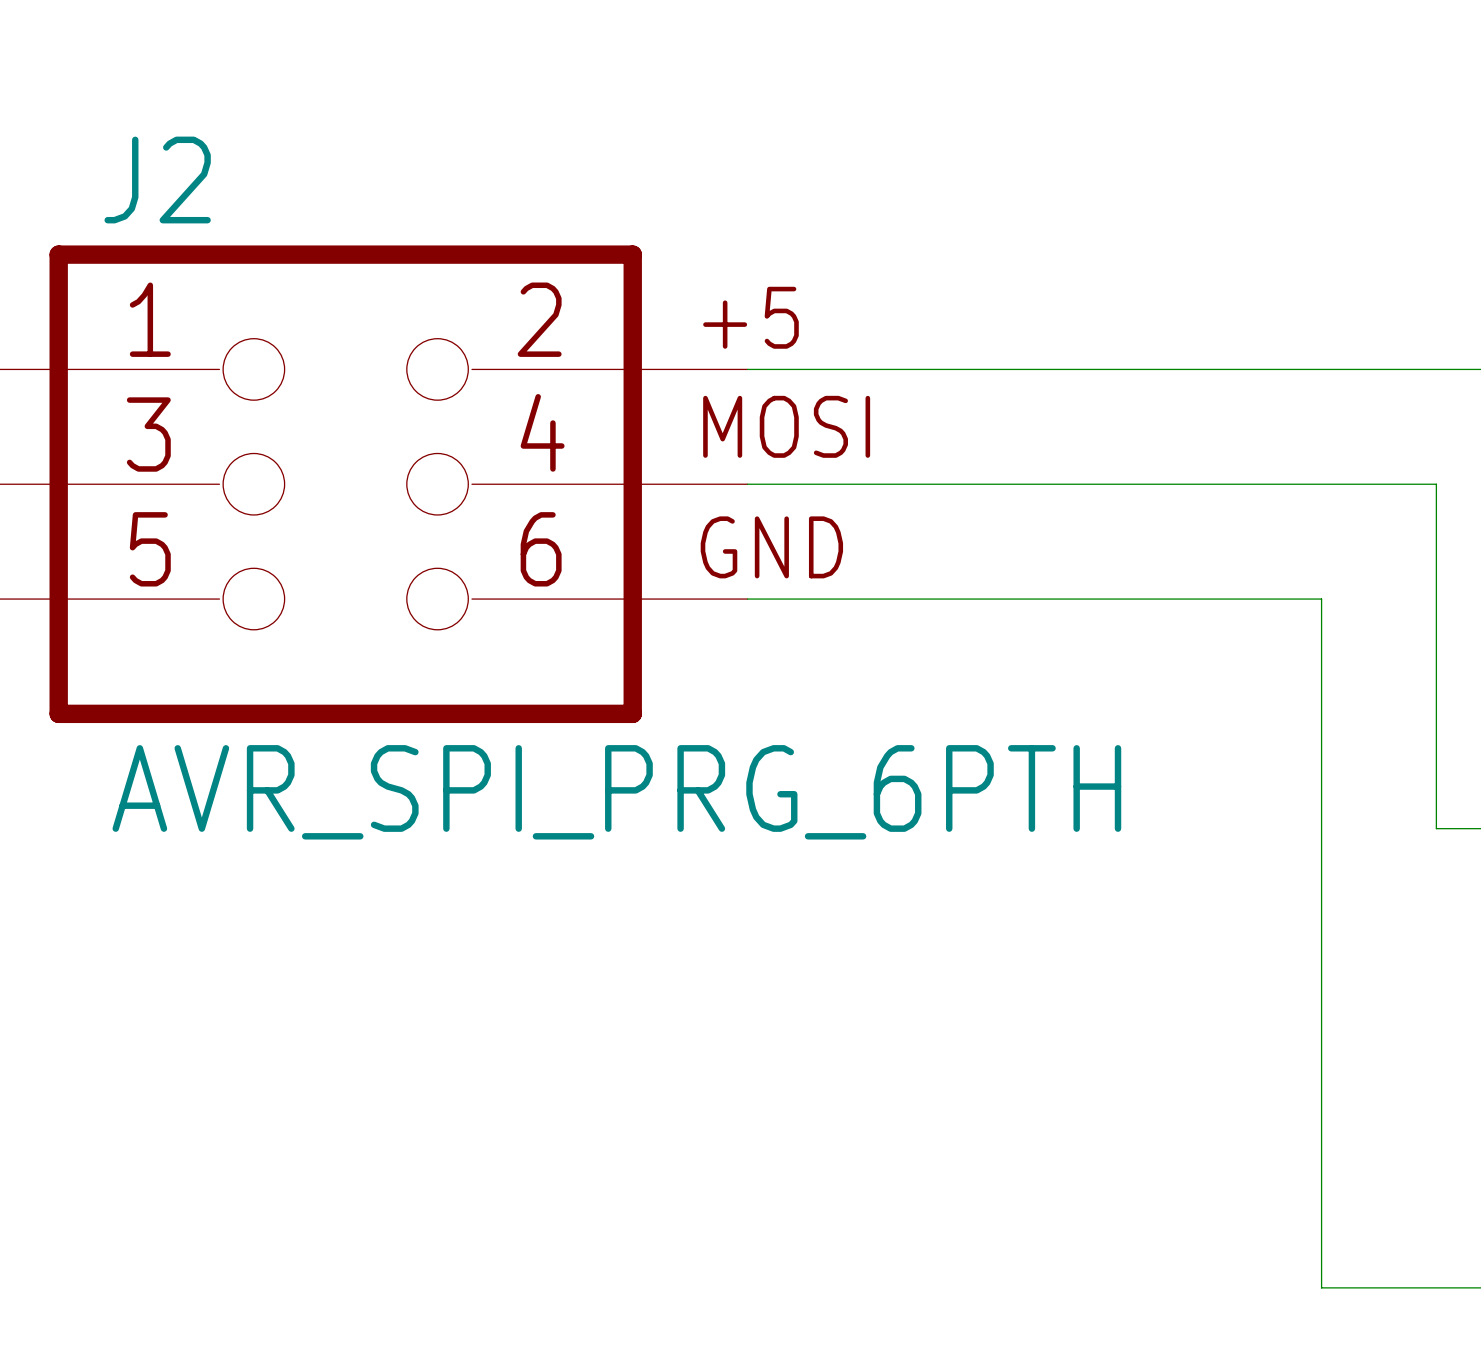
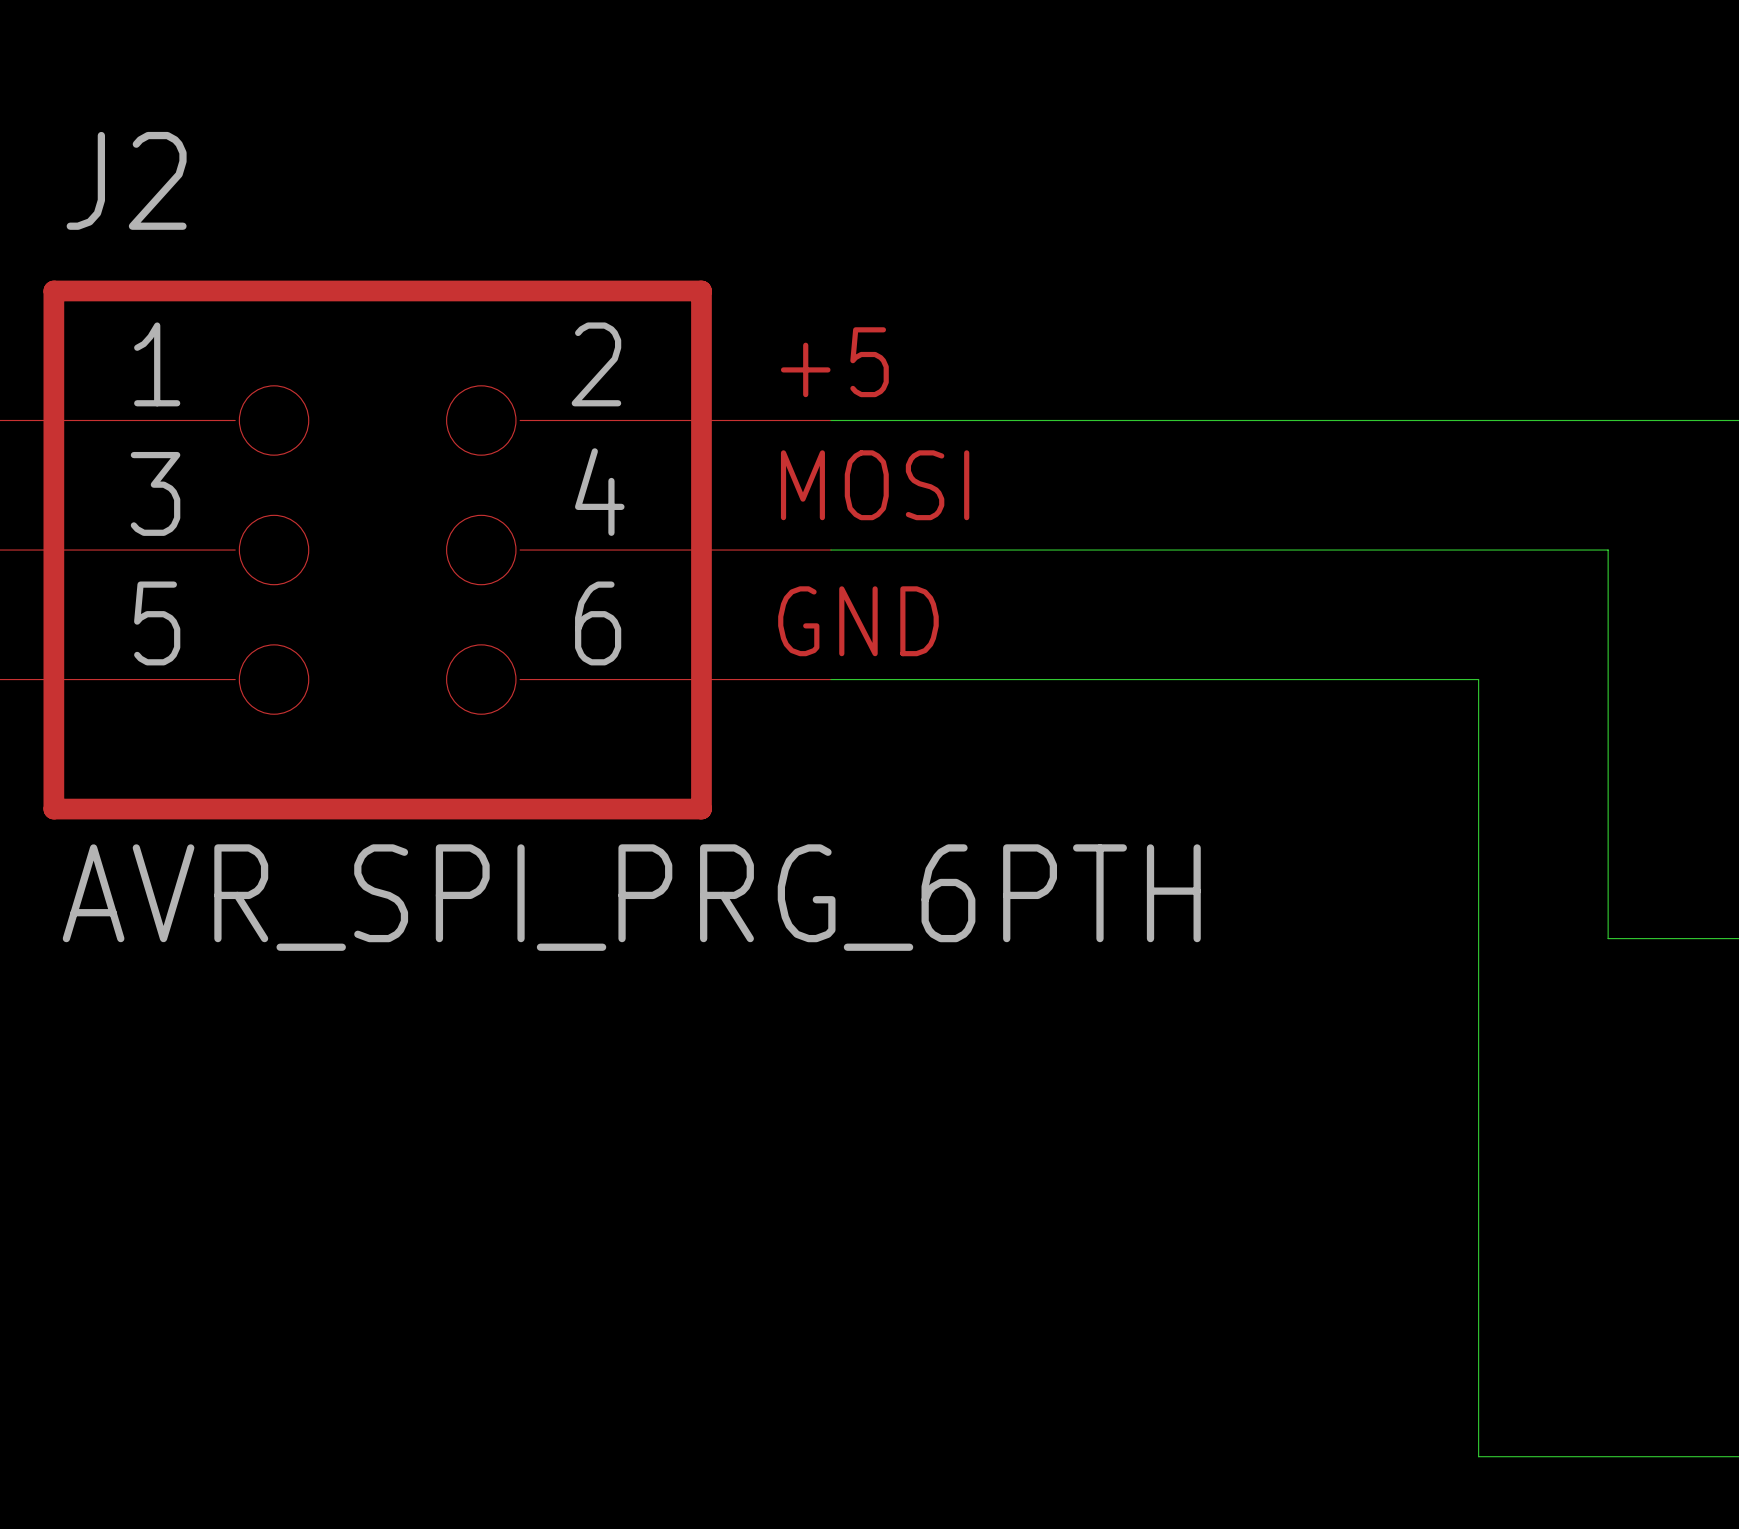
J2 name position: J2 (157, 180) -> J2 (126, 180)
J2 value position: AVR_SPI_PRG_6PTH (616, 792) -> AVR_SPI_PRG_6PTH (631, 897)

